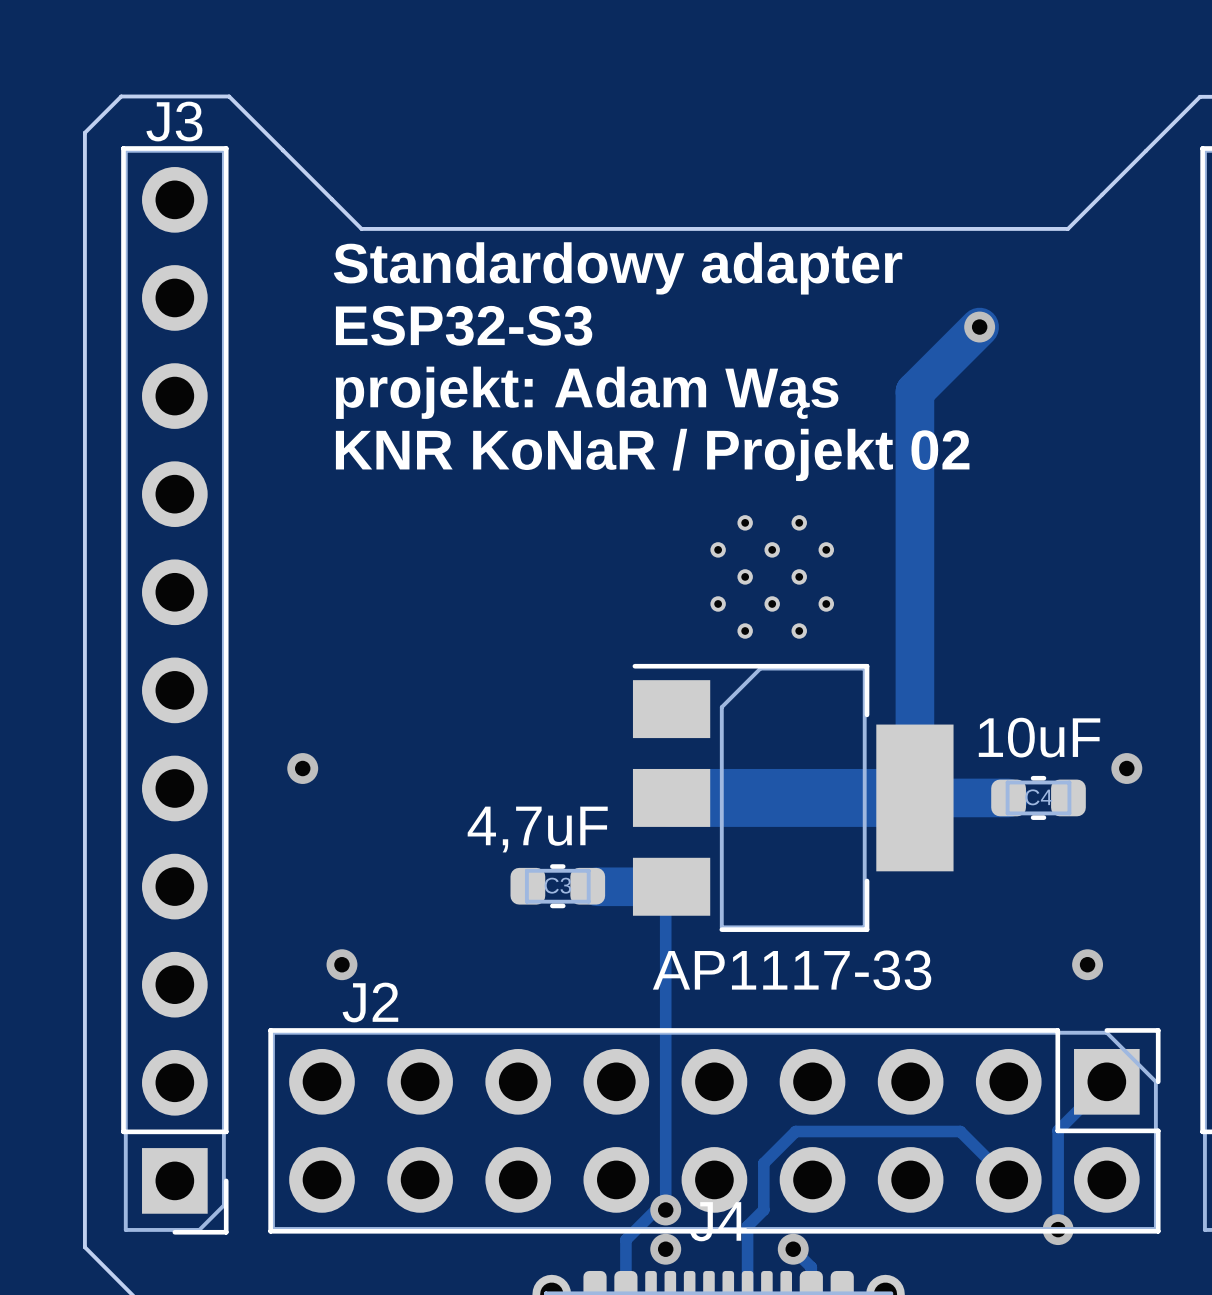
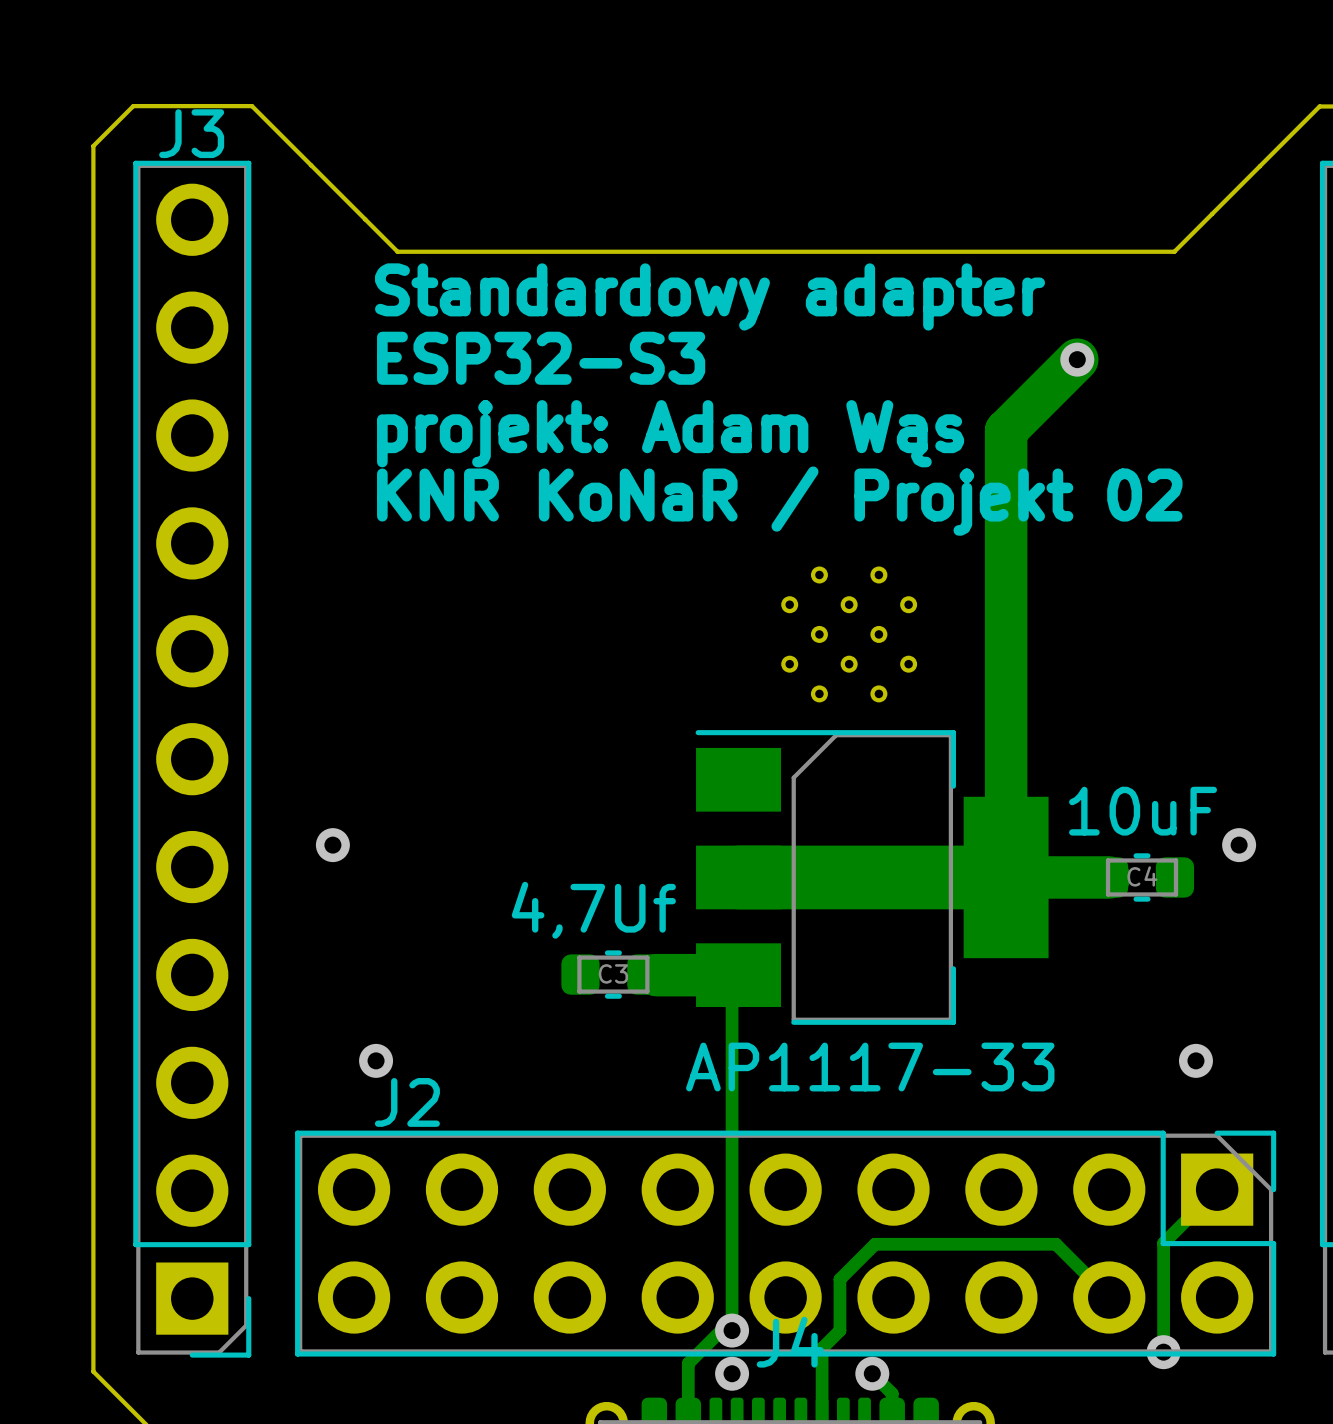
C3 value: 4,7uF (537, 829) -> 4,7Uf (593, 910)

